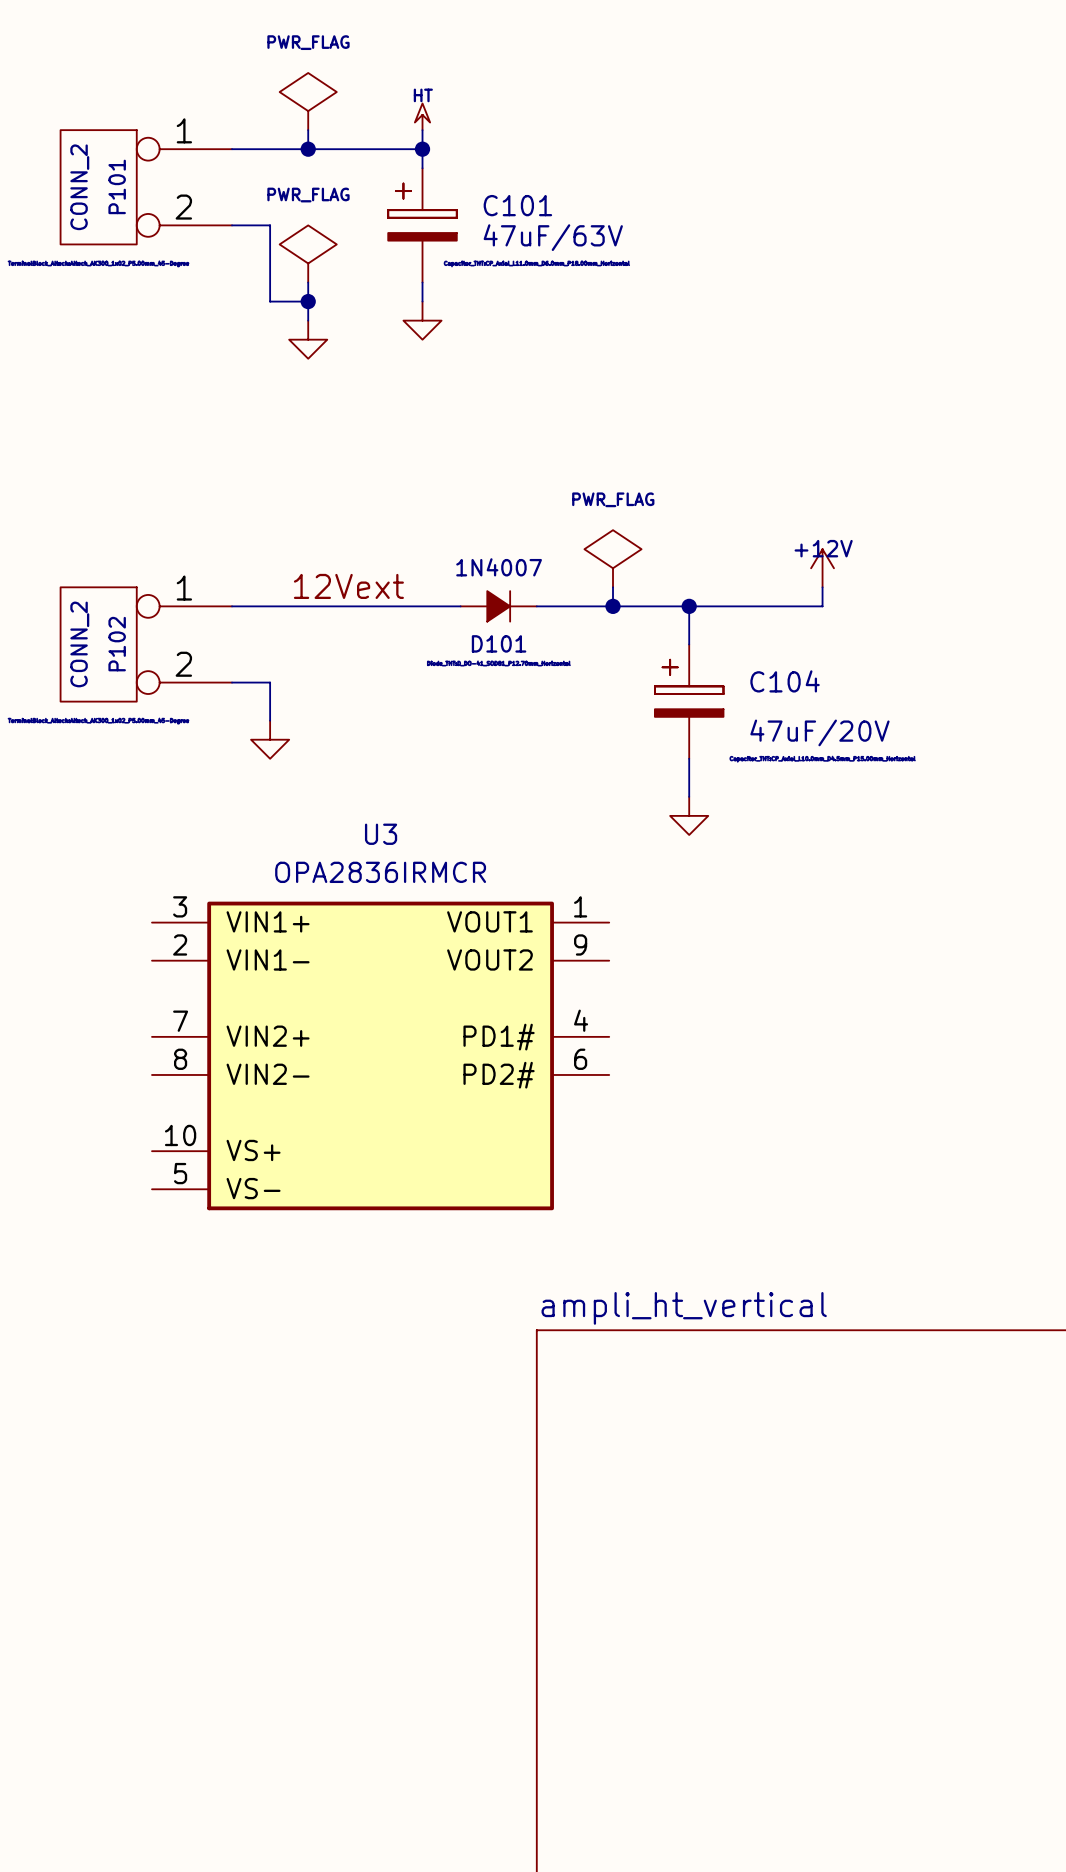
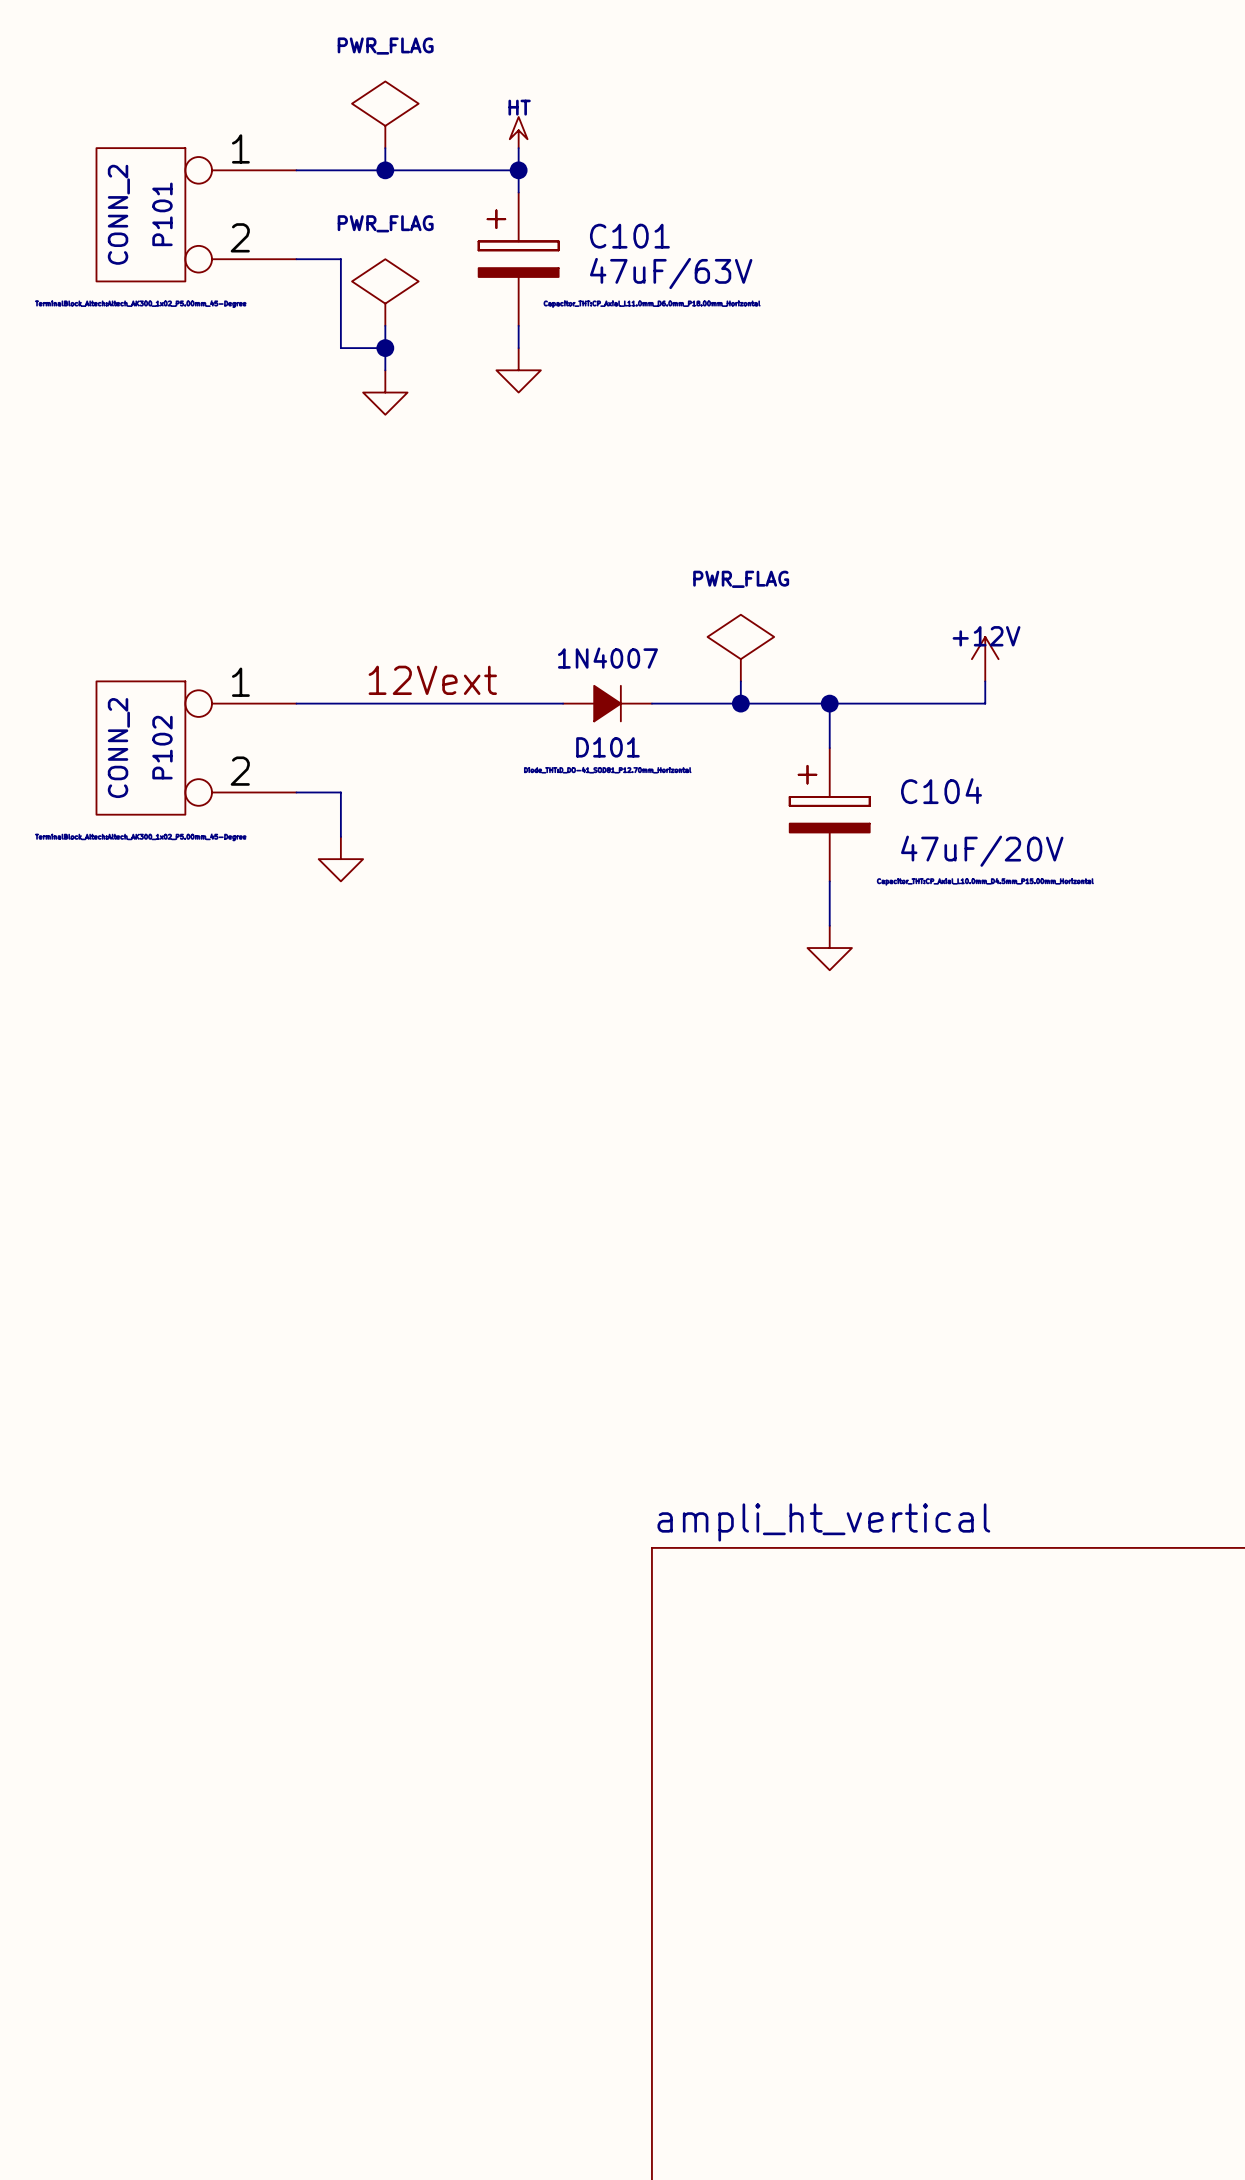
U3: OPA2836IRMCR (380, 1055) -> none

